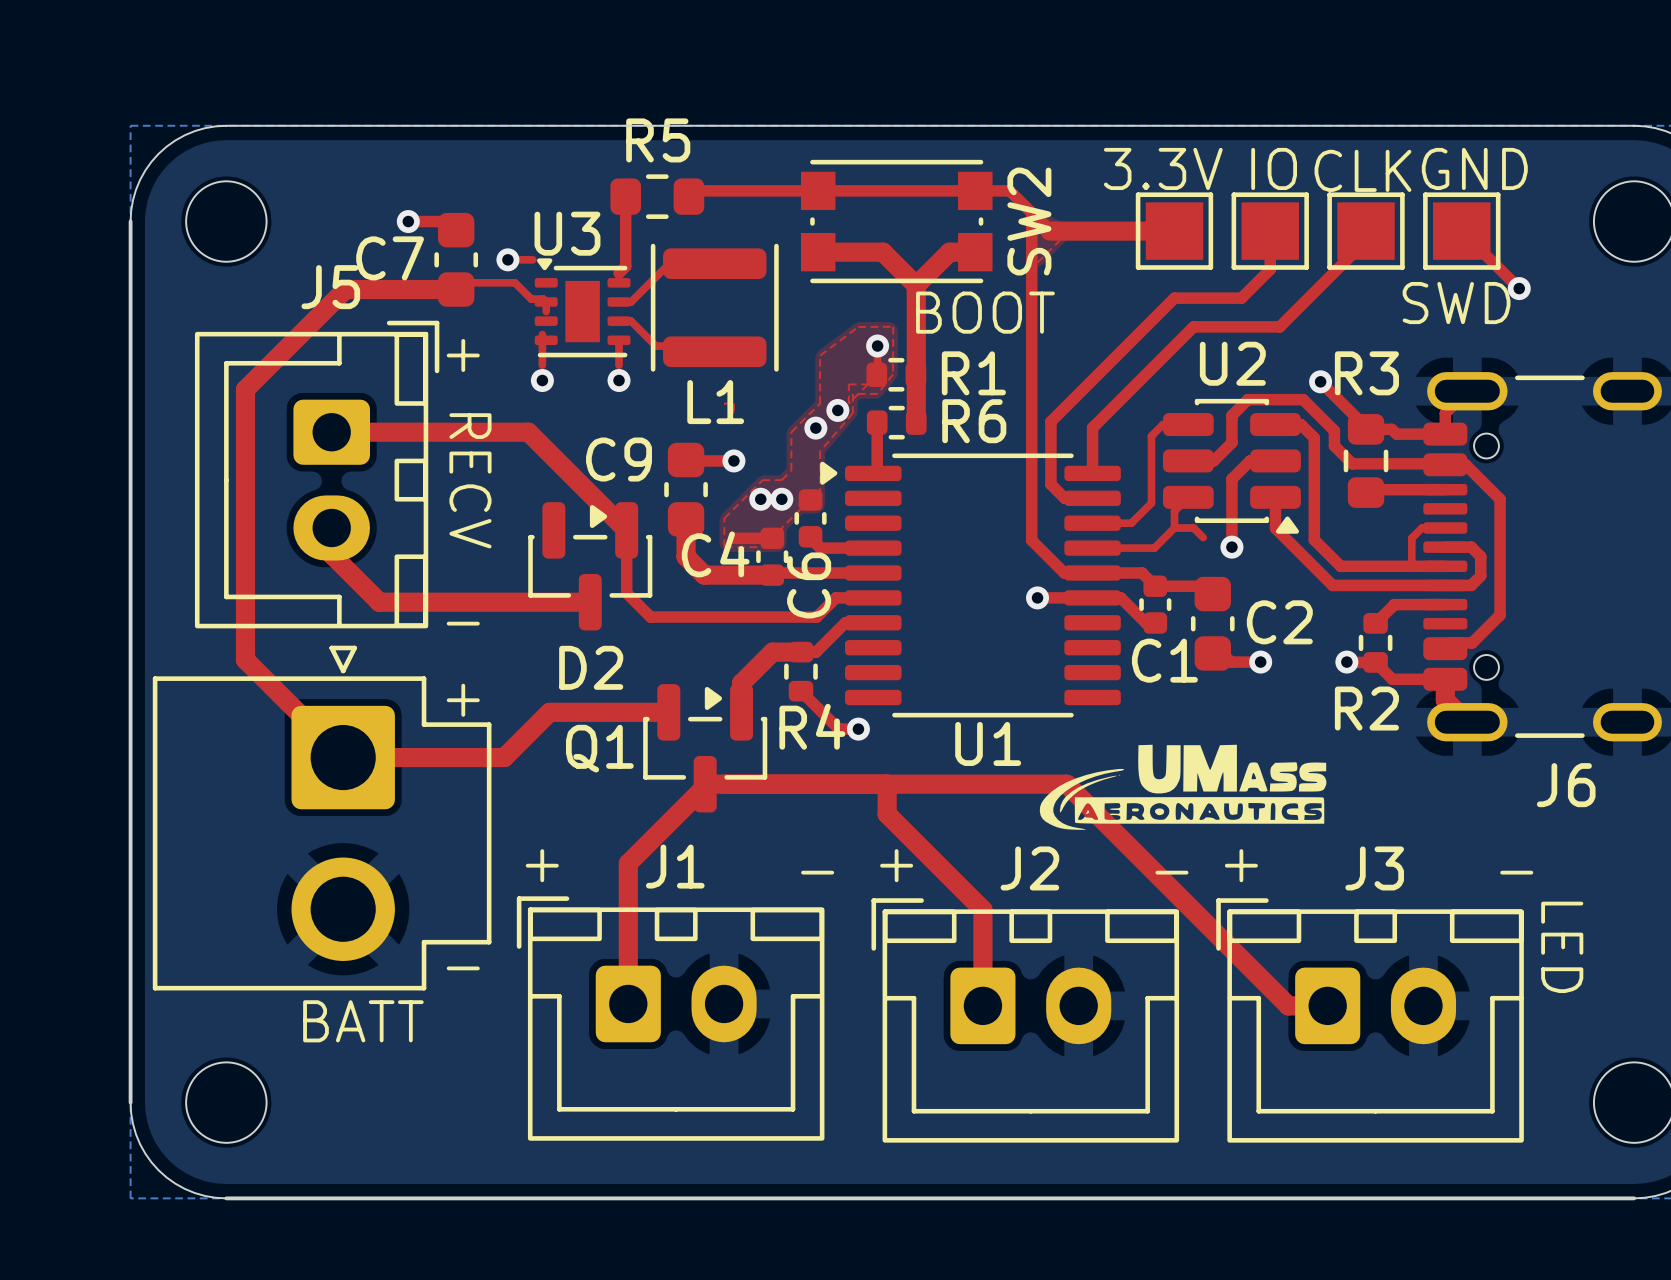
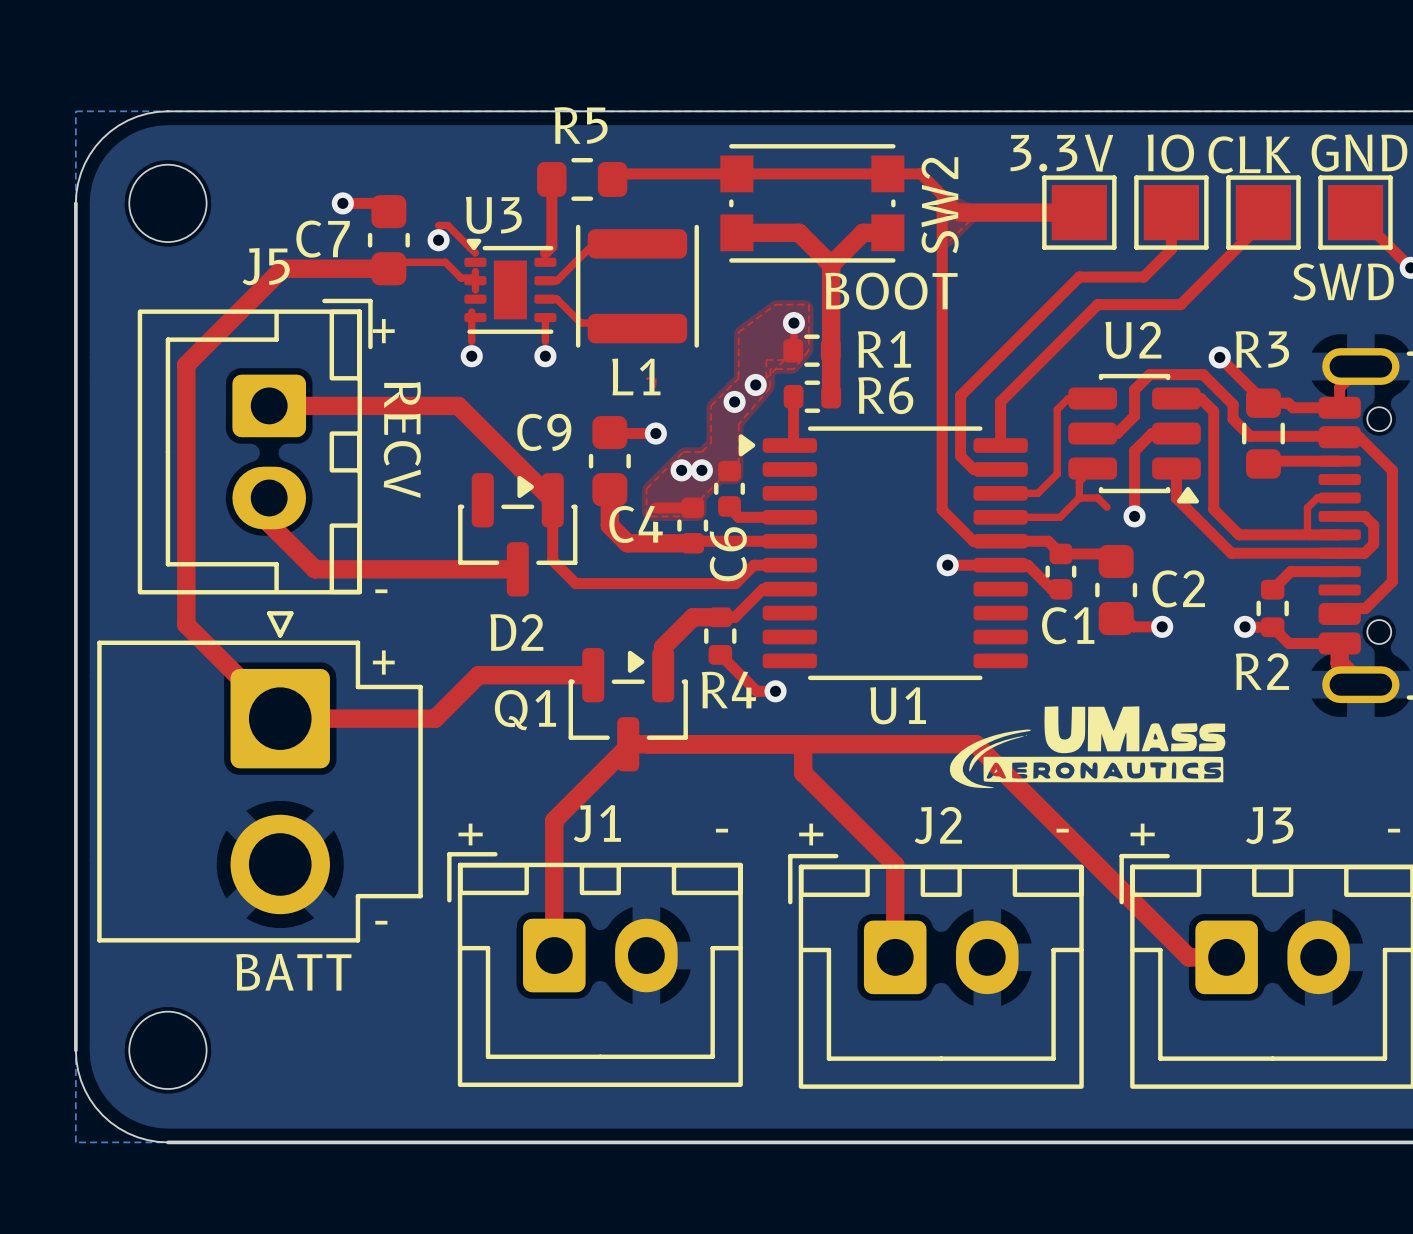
top track: none -> (438, 225) (447, 225) (475, 253)
top track: (507, 259) (532, 259) -> none
top track: none -> (475, 271) (475, 280)

